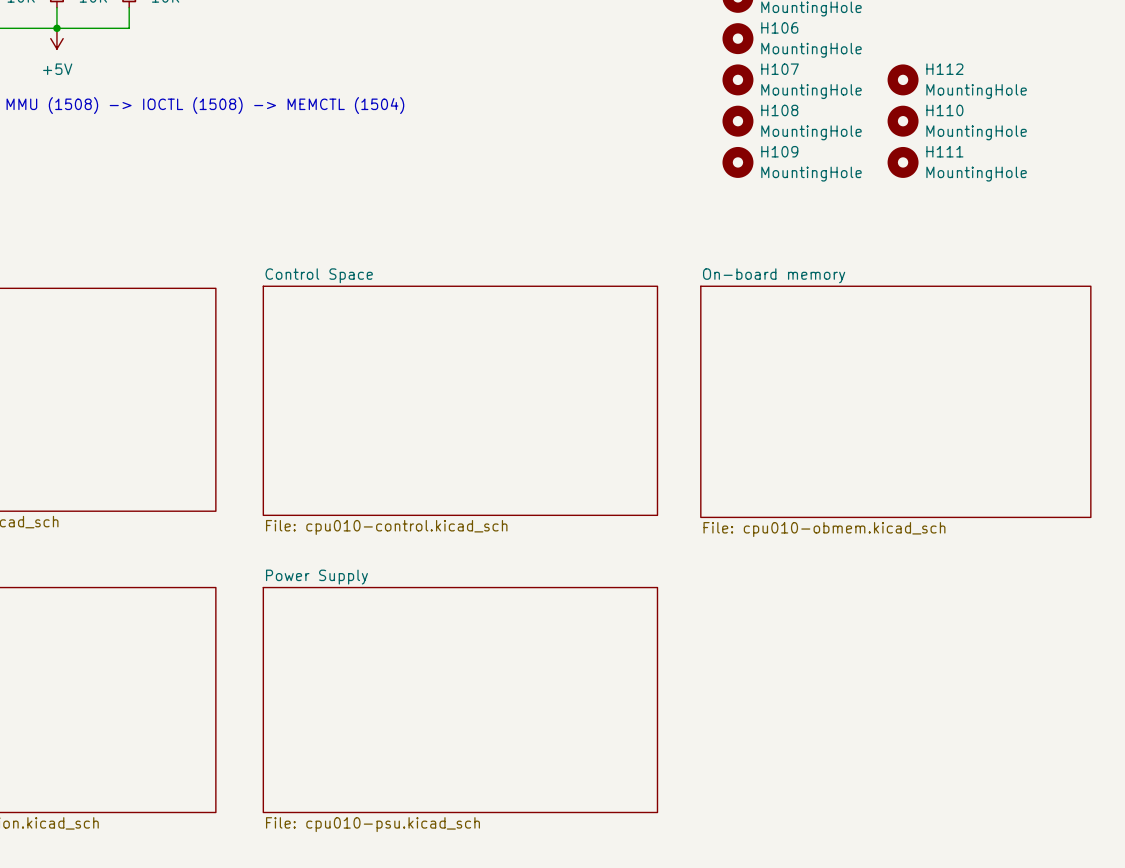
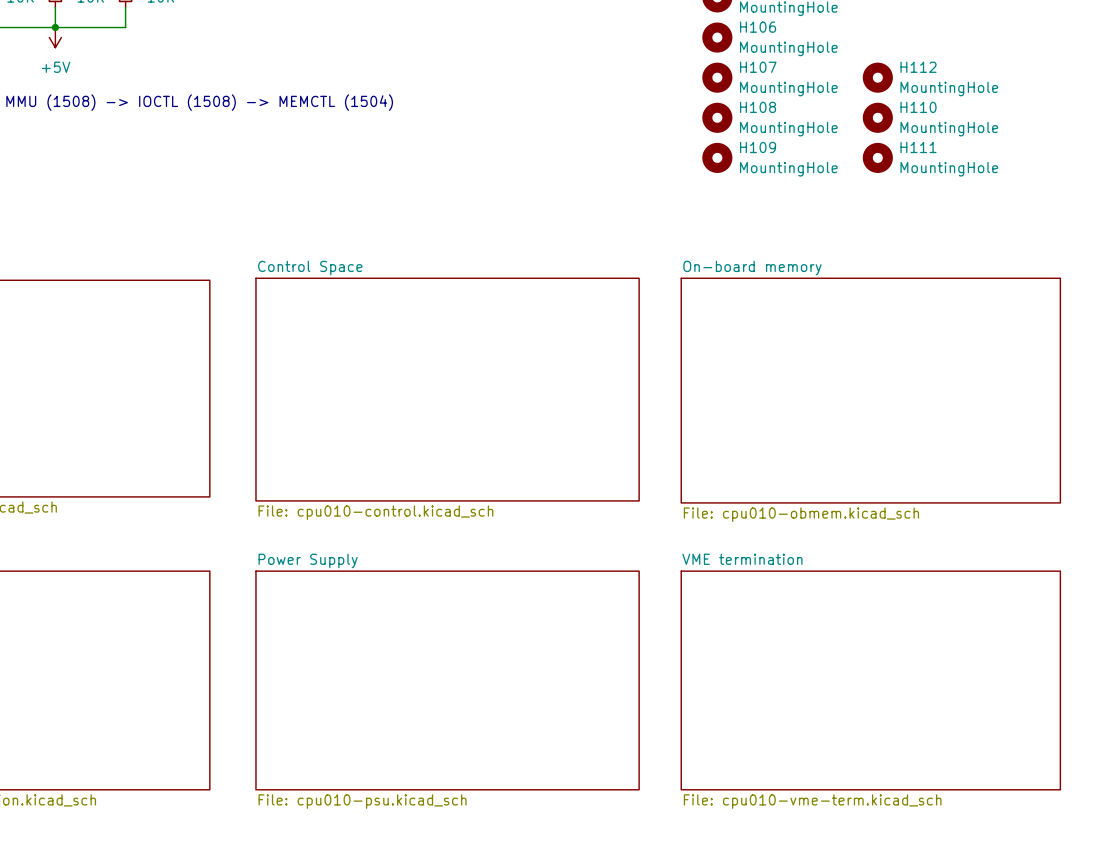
sheet VME termination: none -> File: cpu010-vme-term.kicad_sch (870, 680)

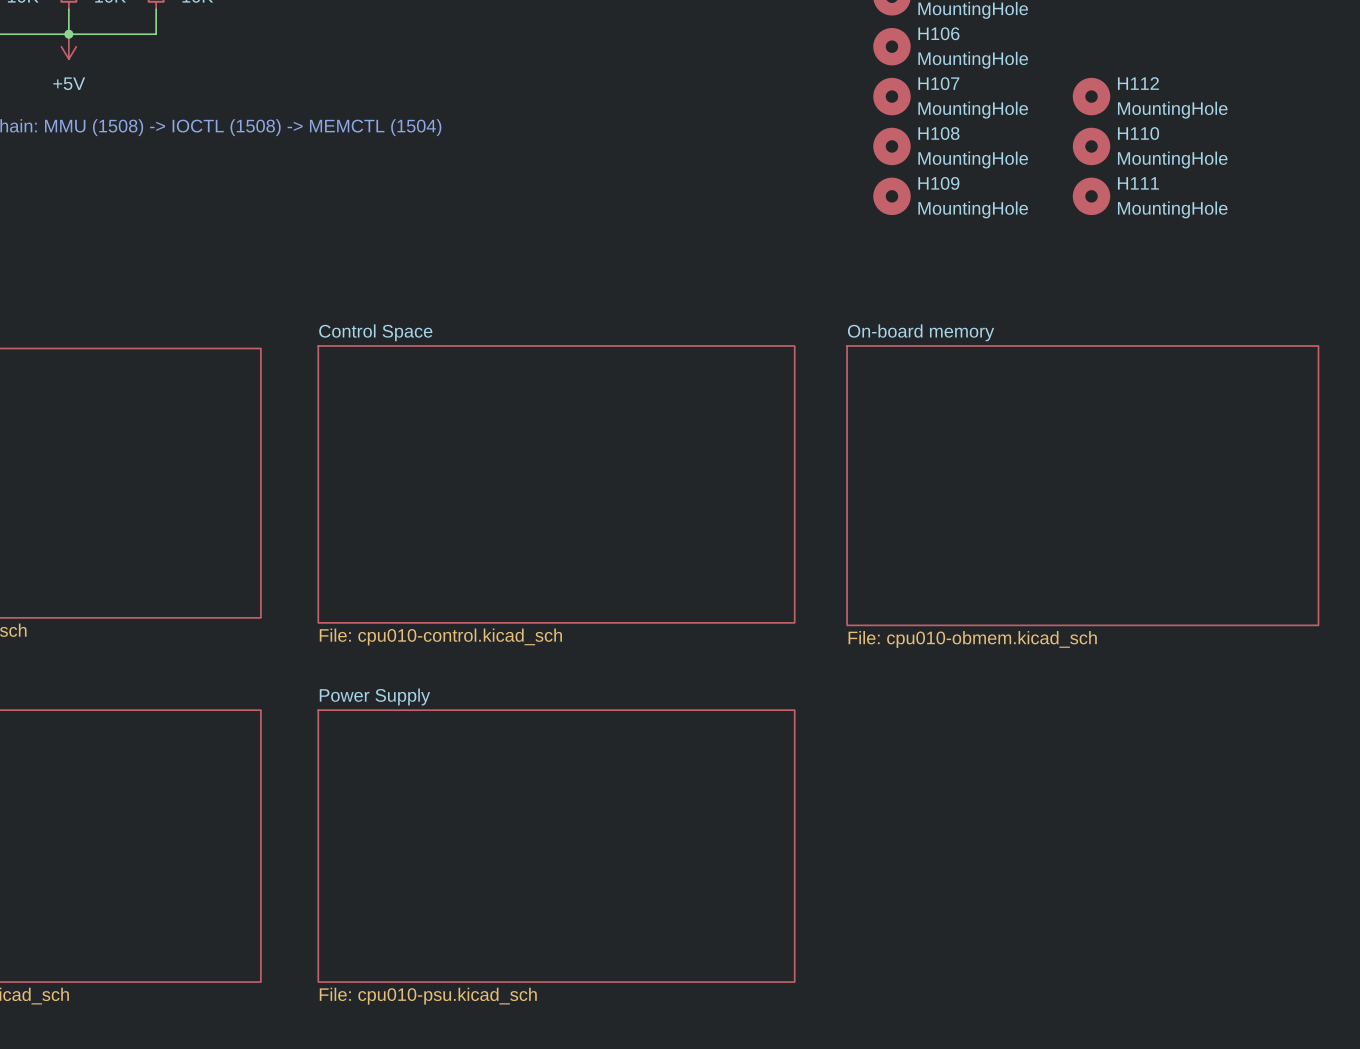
sheet VME termination: File: cpu010-vme-term.kicad_sch (870, 680) -> none

